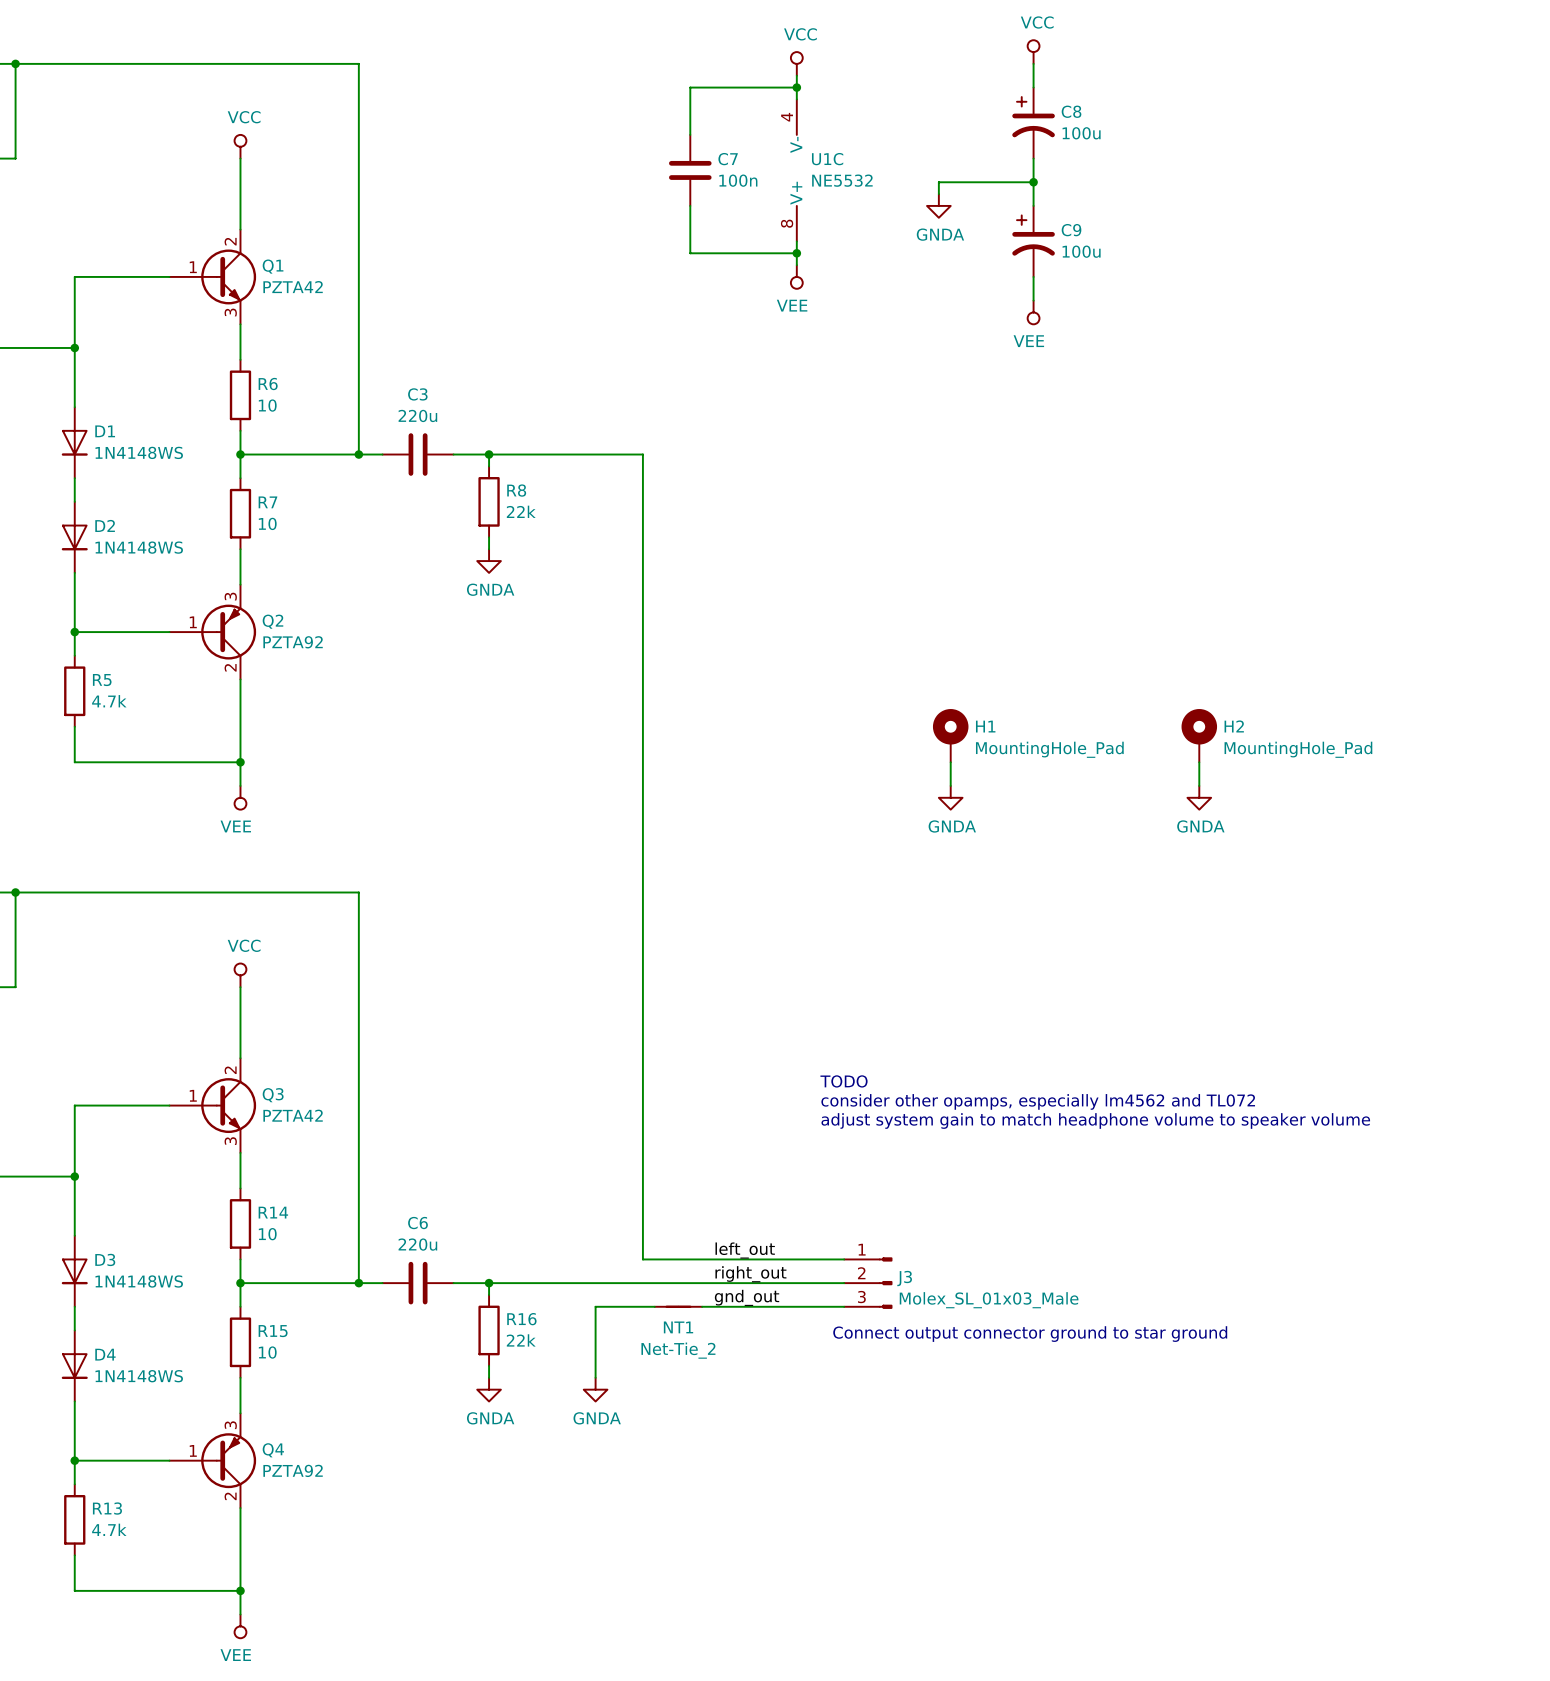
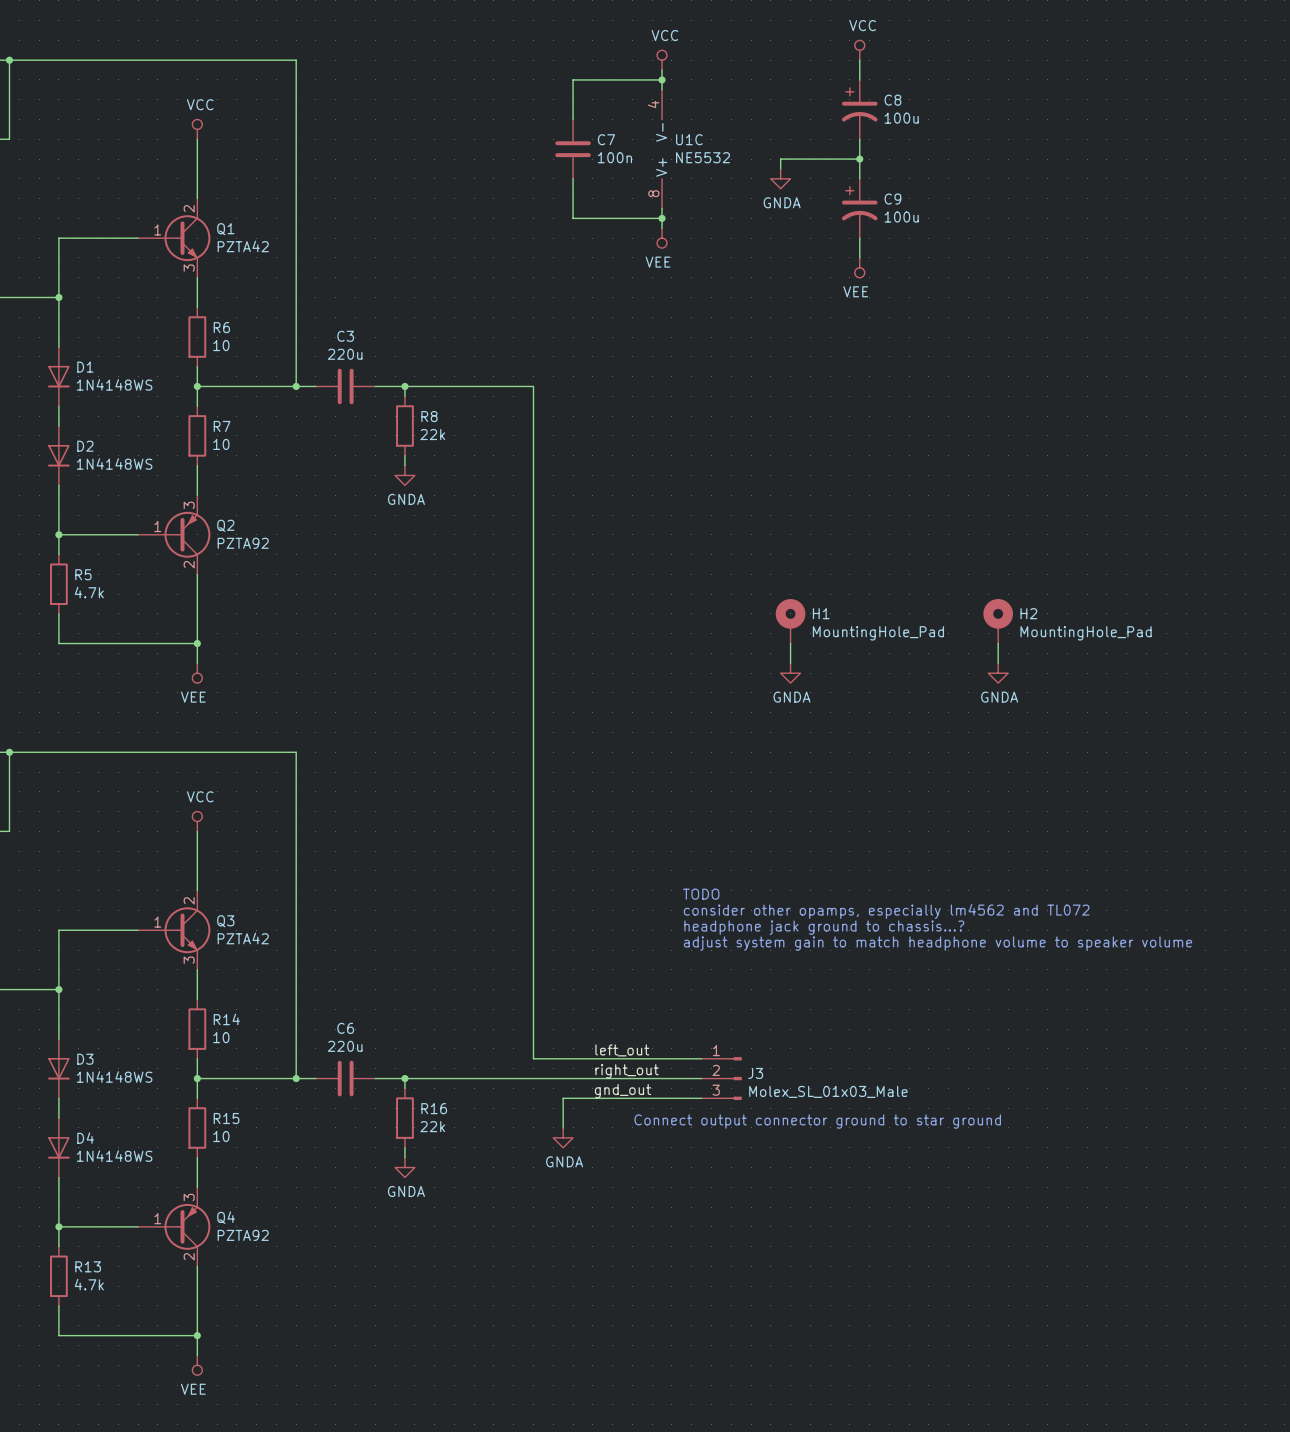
text: none -> TODO (701, 894)
text: TODO (844, 1081) -> consider other opamps, especially lm4562 and TL072 (886, 911)
text: consider other opamps, especially lm4562 and TL072 (1038, 1101) -> headphone jack ground to chassis...? (824, 927)
wire: (654, 1306) (595, 1306) (595, 1377) -> none
NT1: Net-Tie_2 (678, 1306) -> none
wire: none -> (582, 1098) (563, 1098) (563, 1127)
text position: Connect output connector ground to star ground (1030, 1334) -> Connect output connector ground to star ground (817, 1121)
power symbol position: GNDA (595, 1389) -> GNDA (563, 1137)

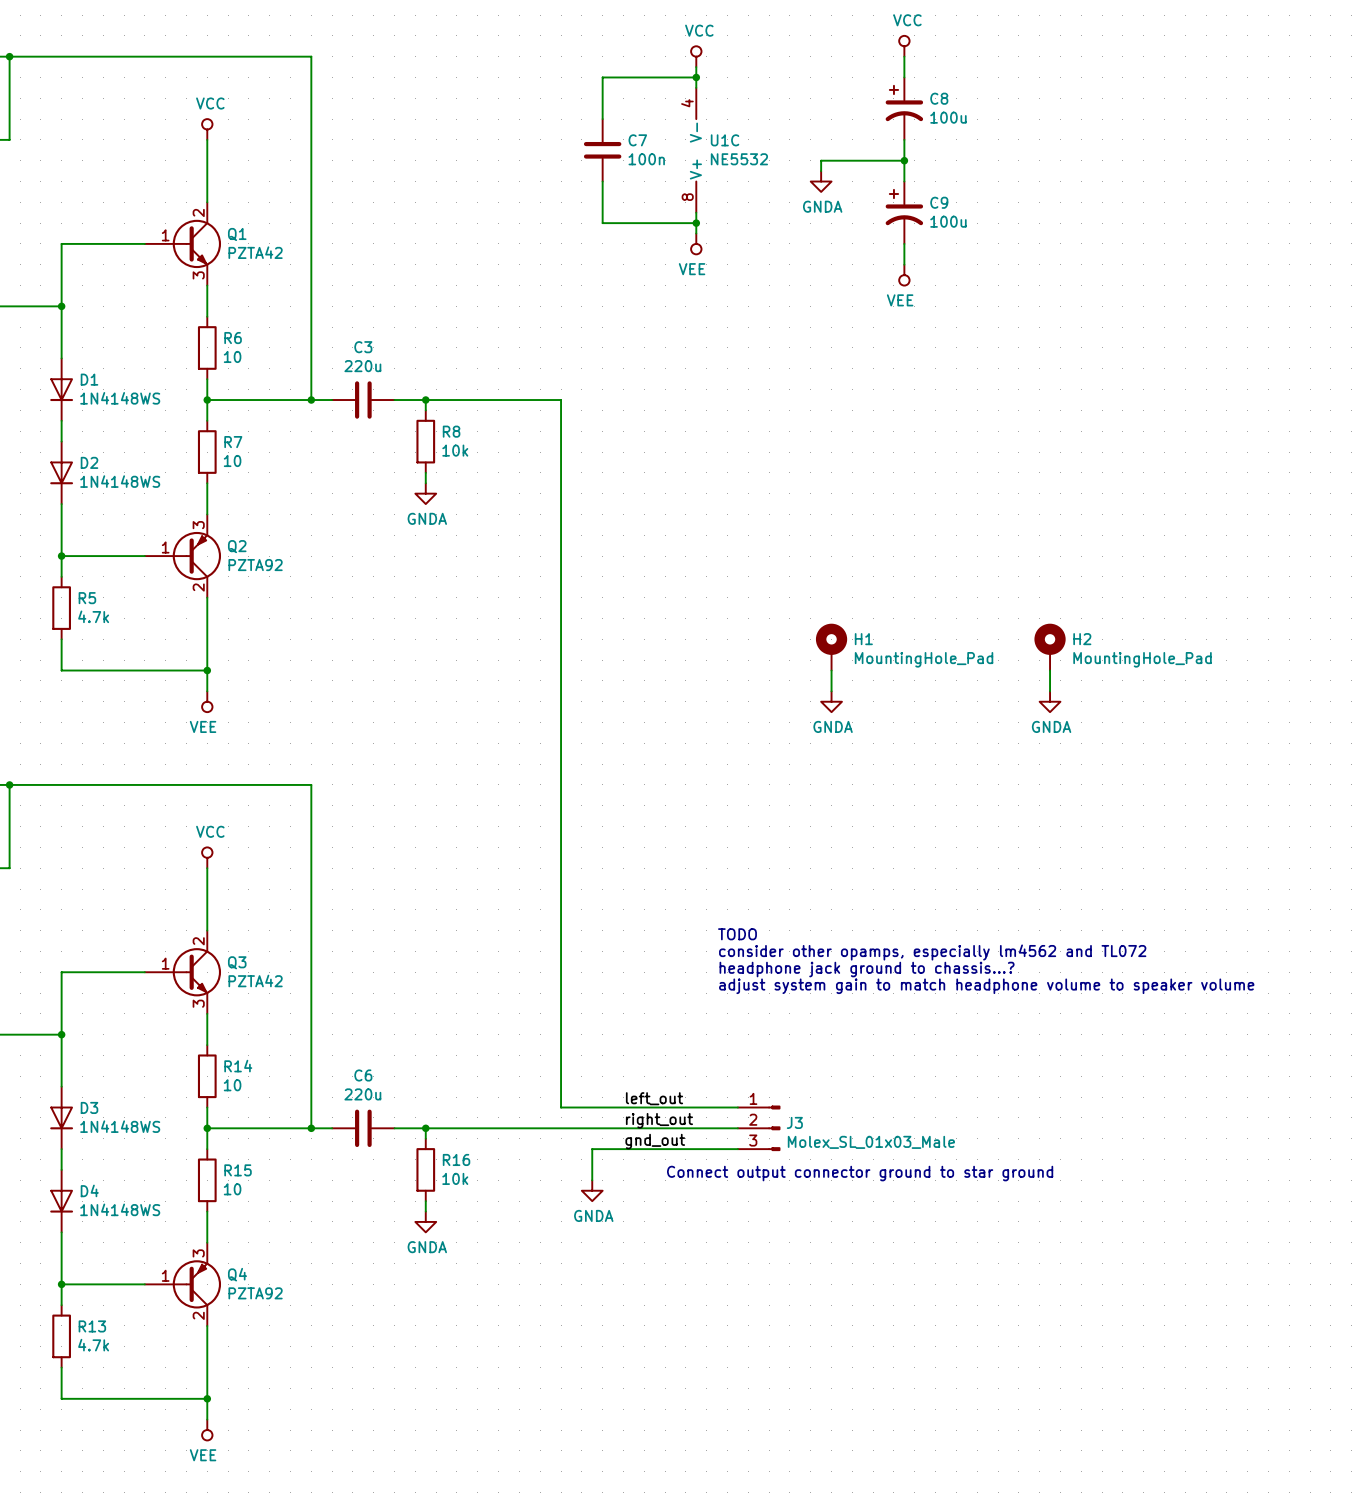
R8 value: 22k (432, 434) -> 10k (455, 450)
R16 value: 22k (432, 1126) -> 10k (455, 1178)

